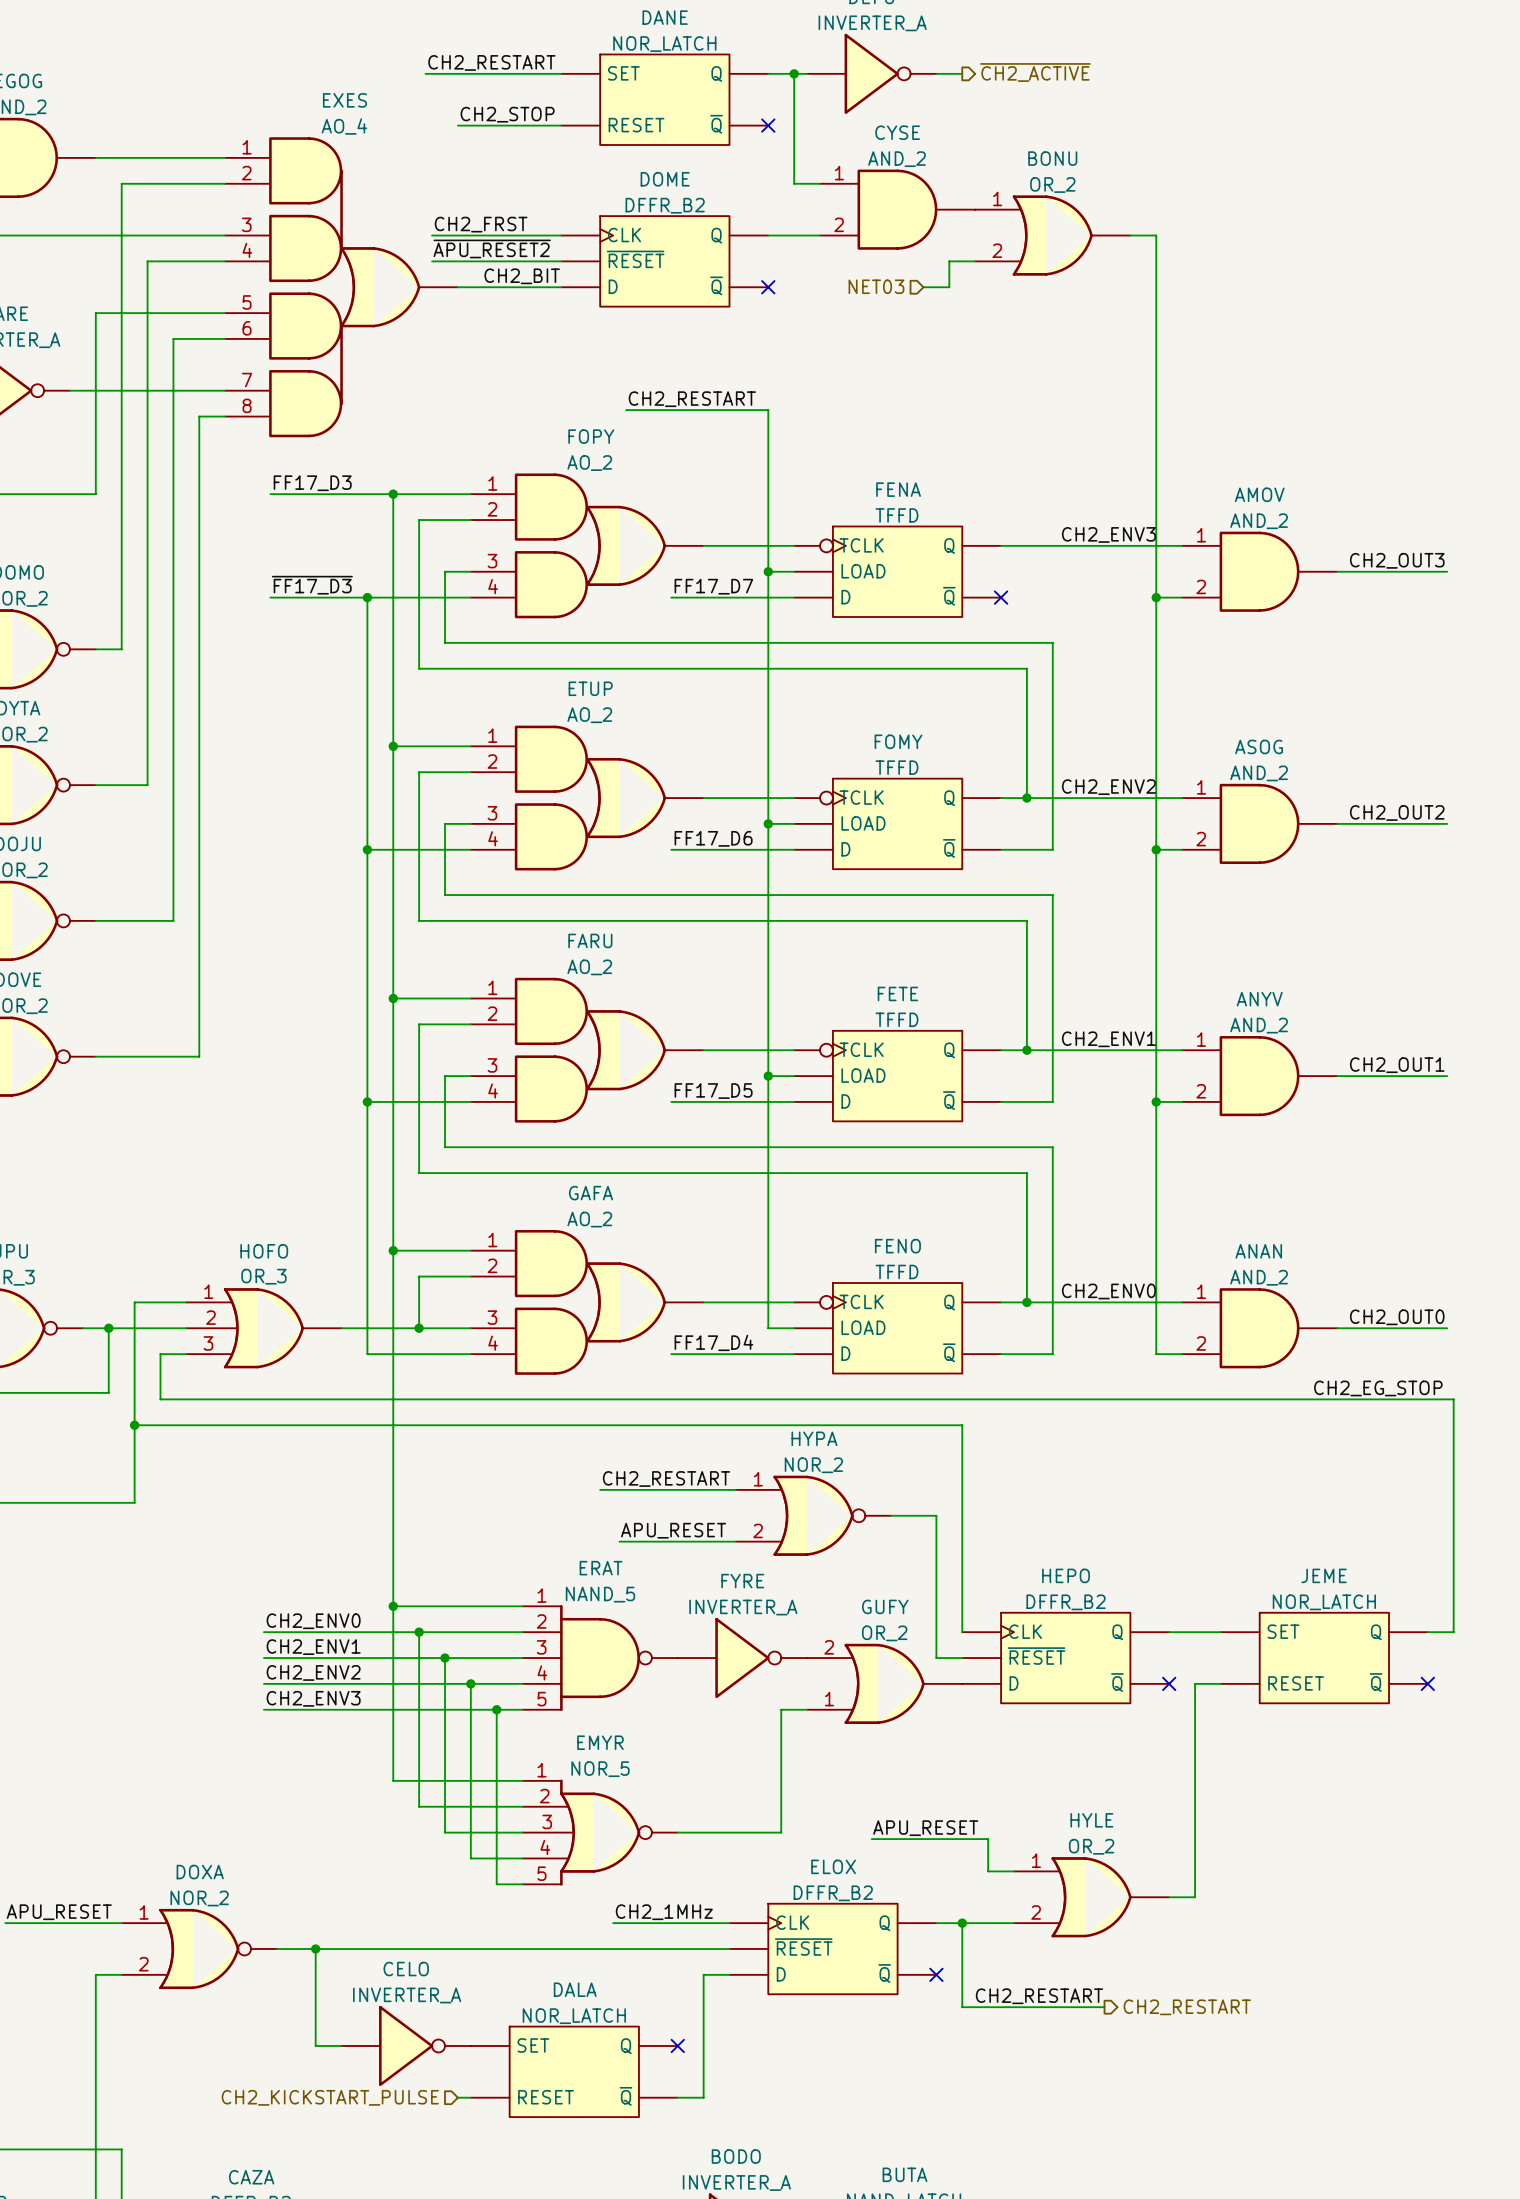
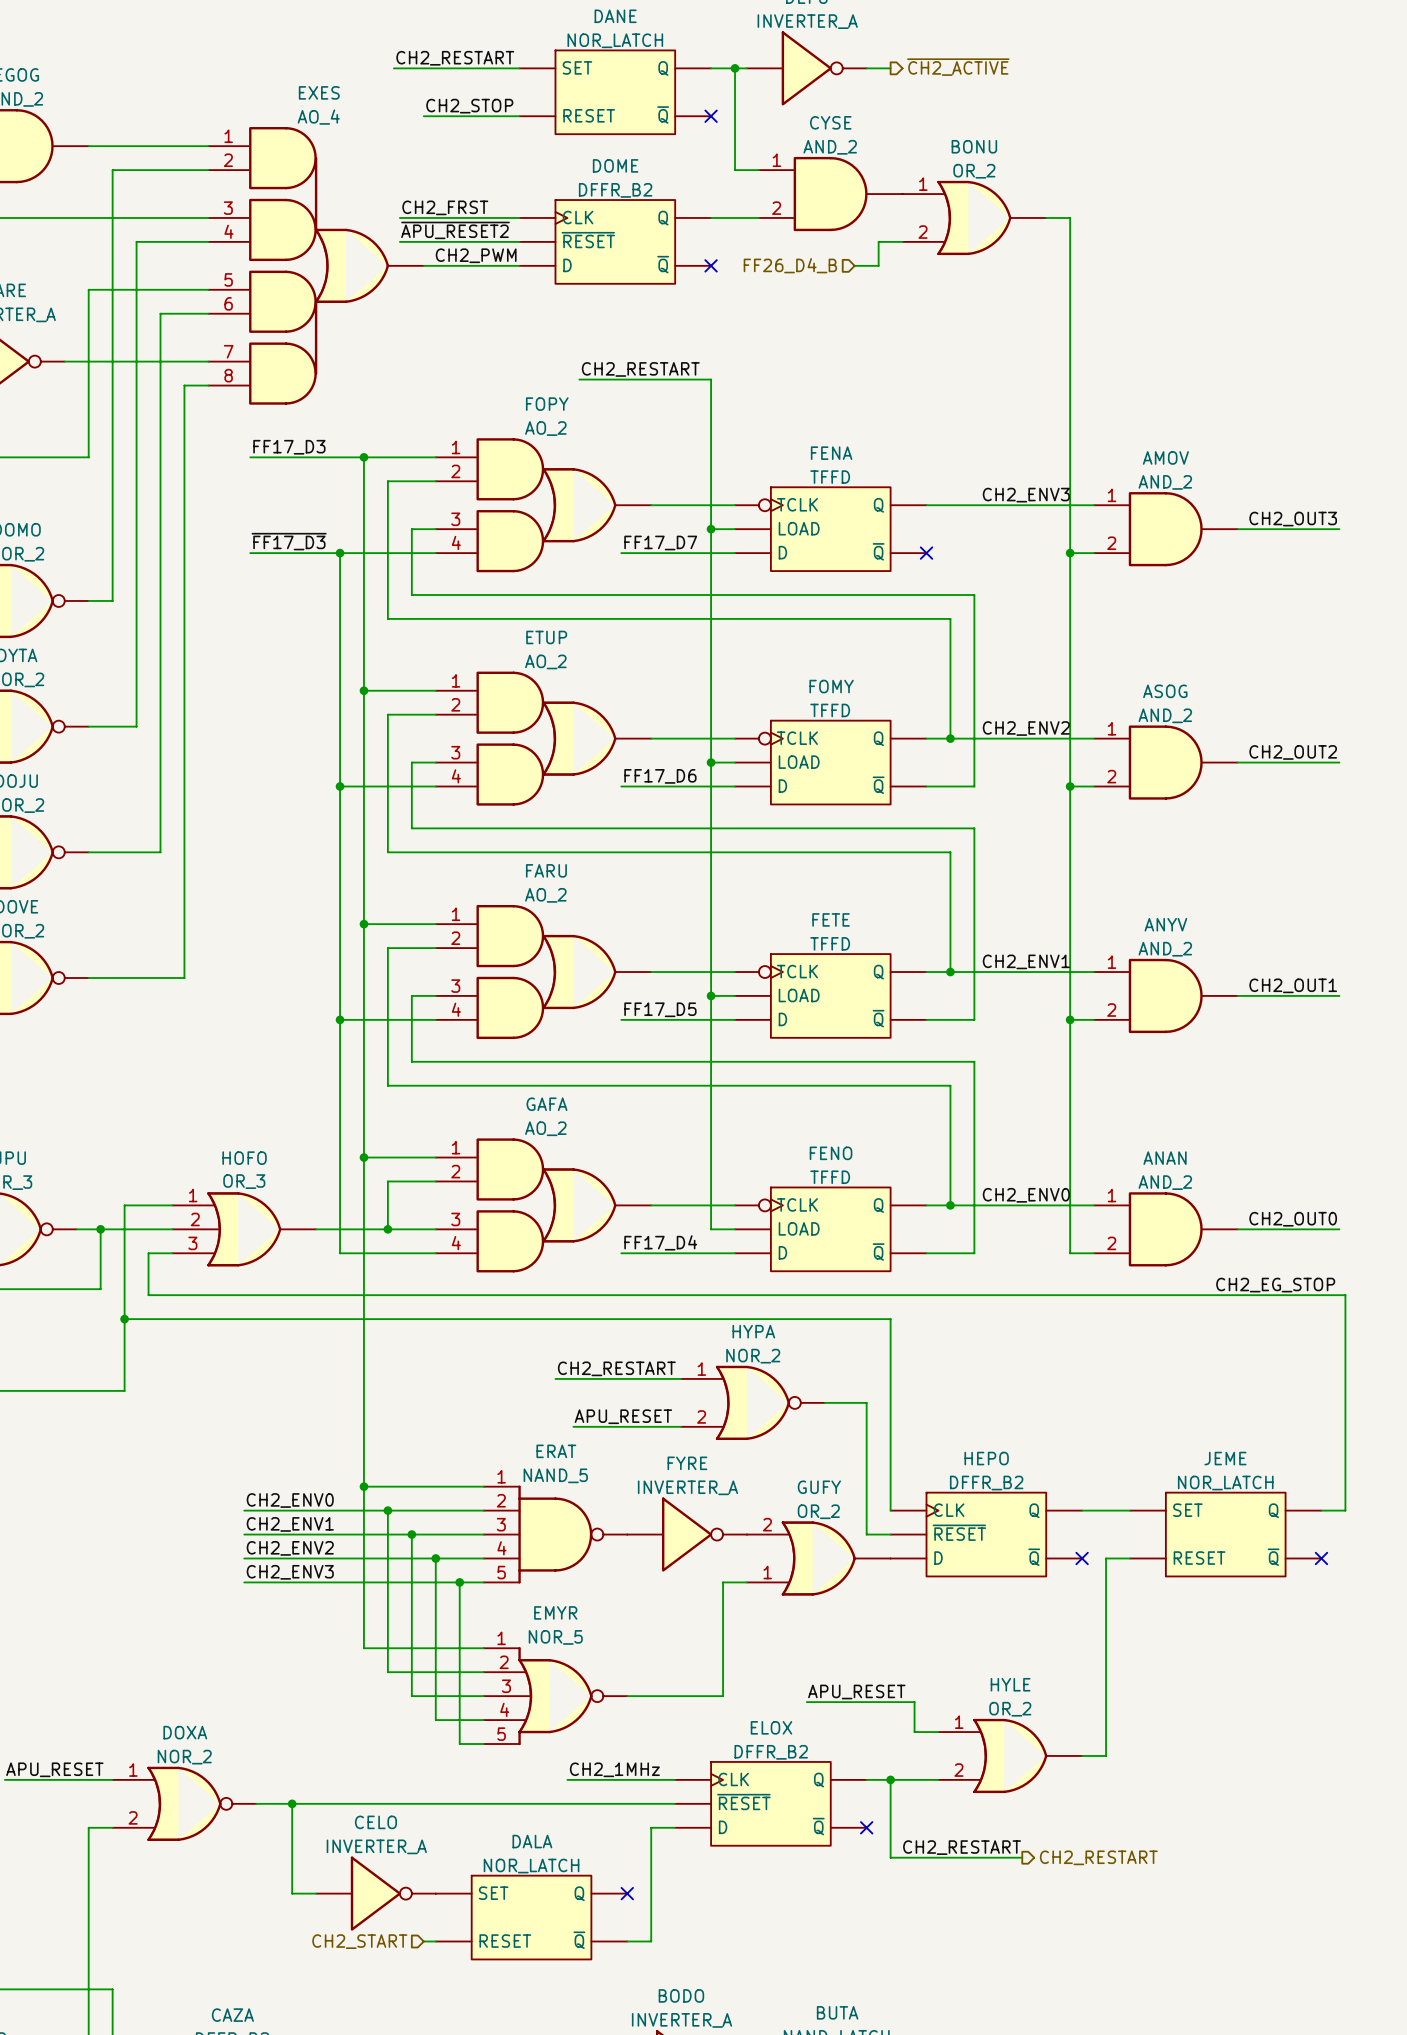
label: CH2_BIT (522, 276) -> CH2_PWM (476, 255)
hierarchical label: NET03 (876, 286) -> FF26_D4_B (790, 265)
hierarchical label: CH2_KICKSTART_PULSE (330, 2097) -> CH2_START (359, 1941)

